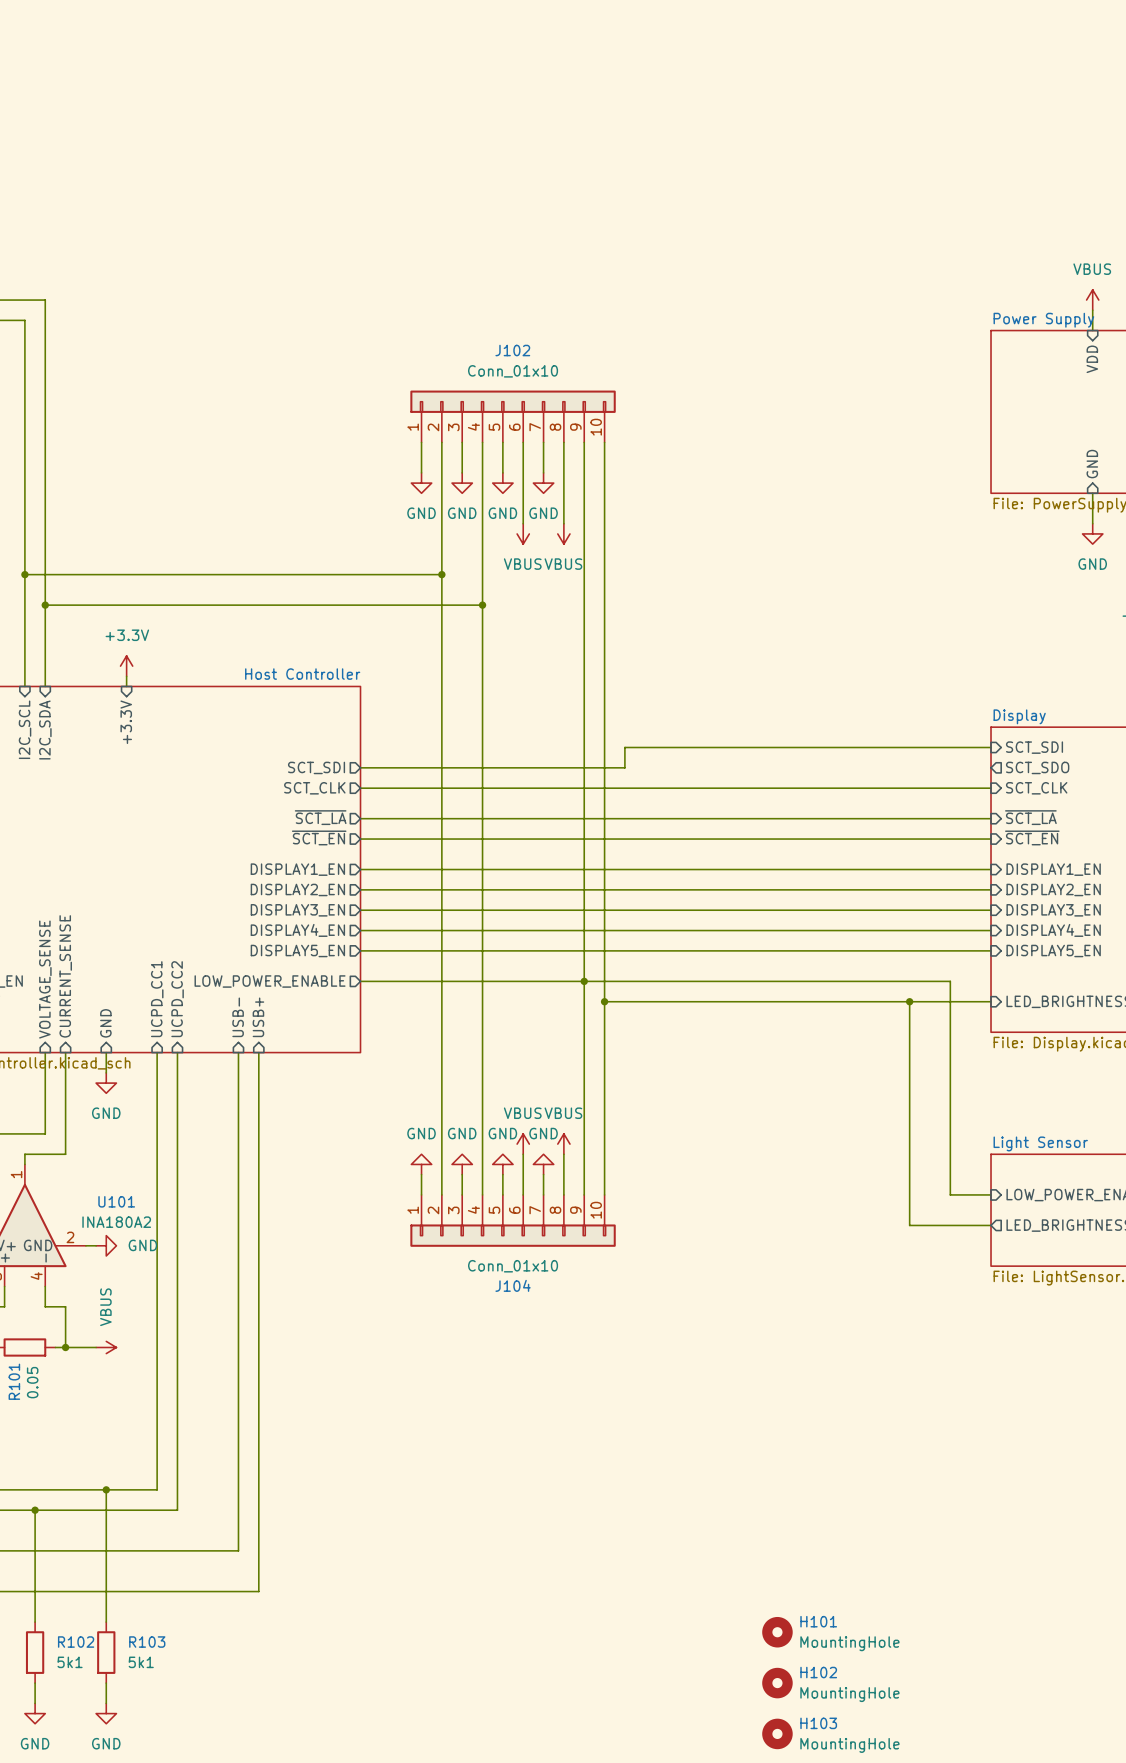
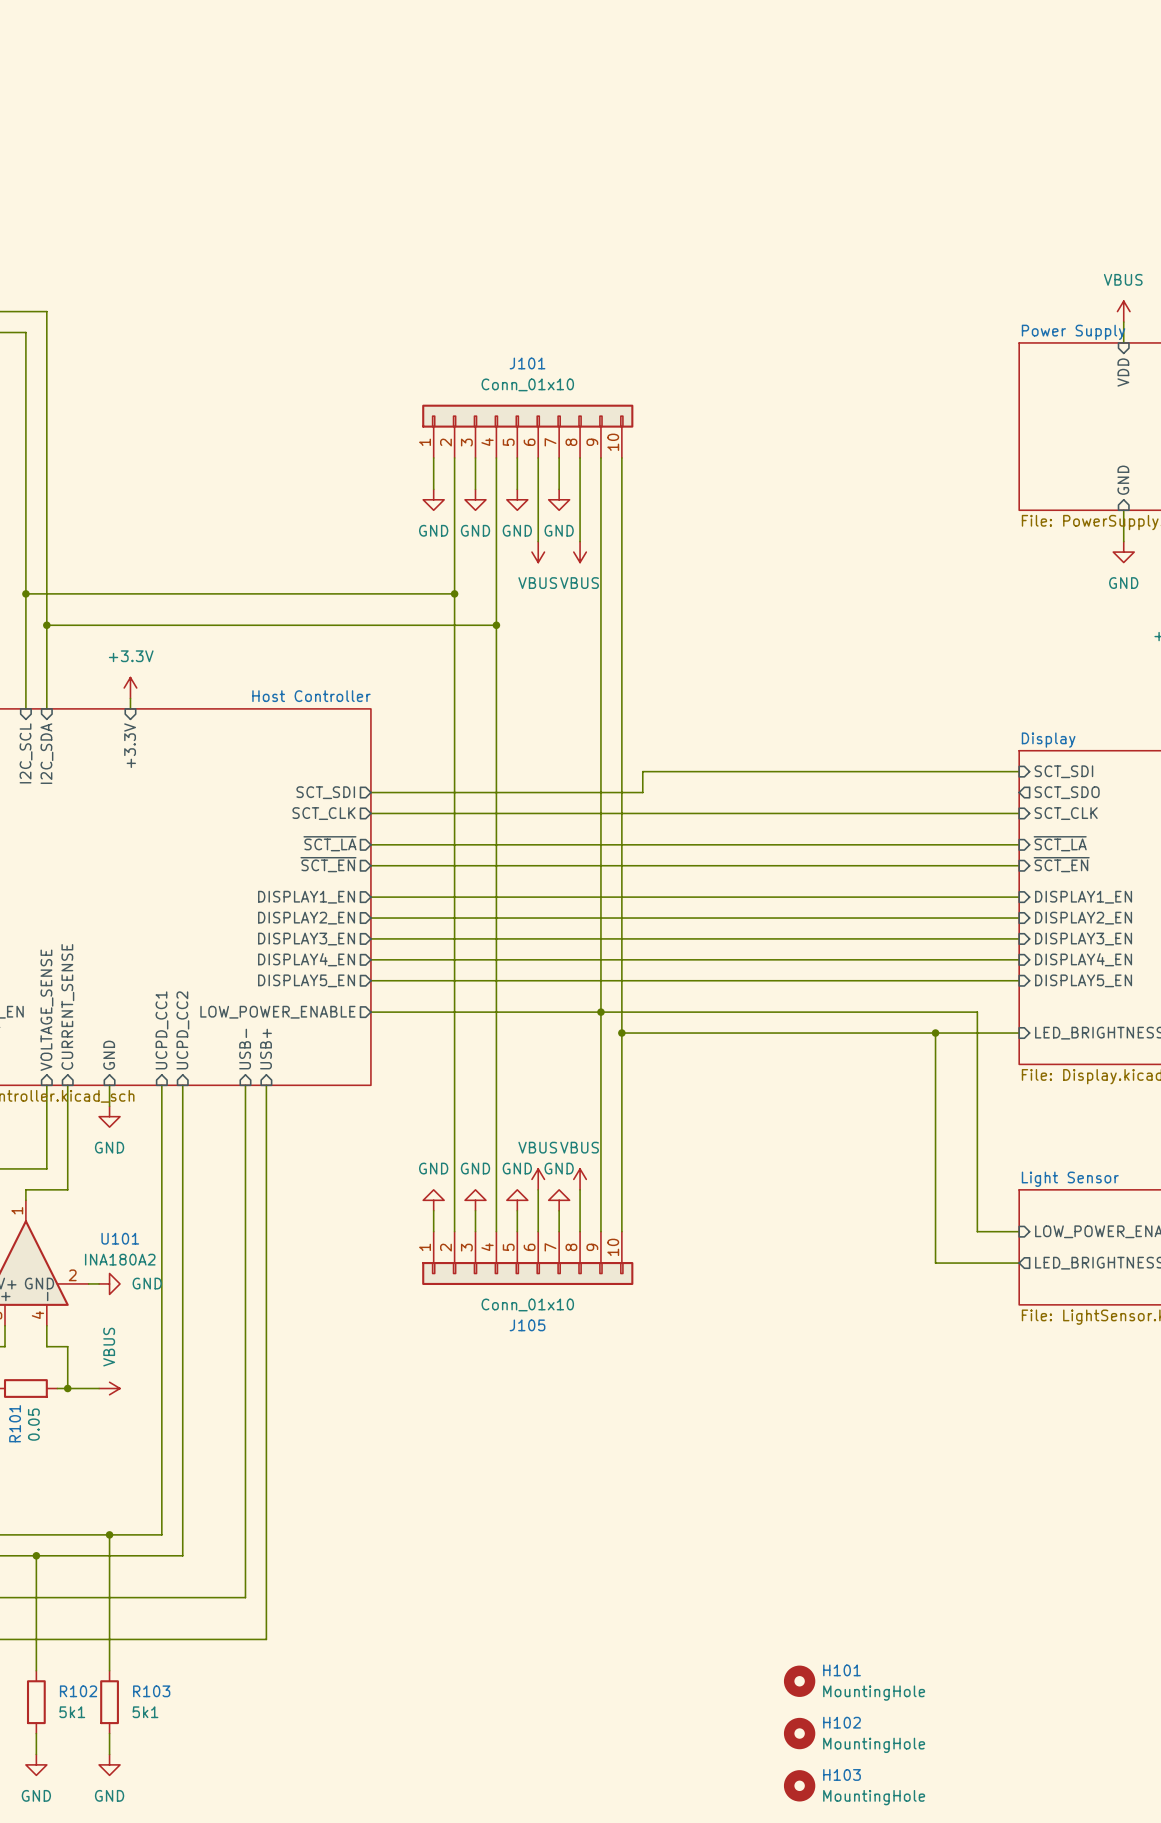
J102 name: J102 (512, 350) -> J101 (527, 363)
J104 name: J104 (513, 1285) -> J105 (527, 1325)

